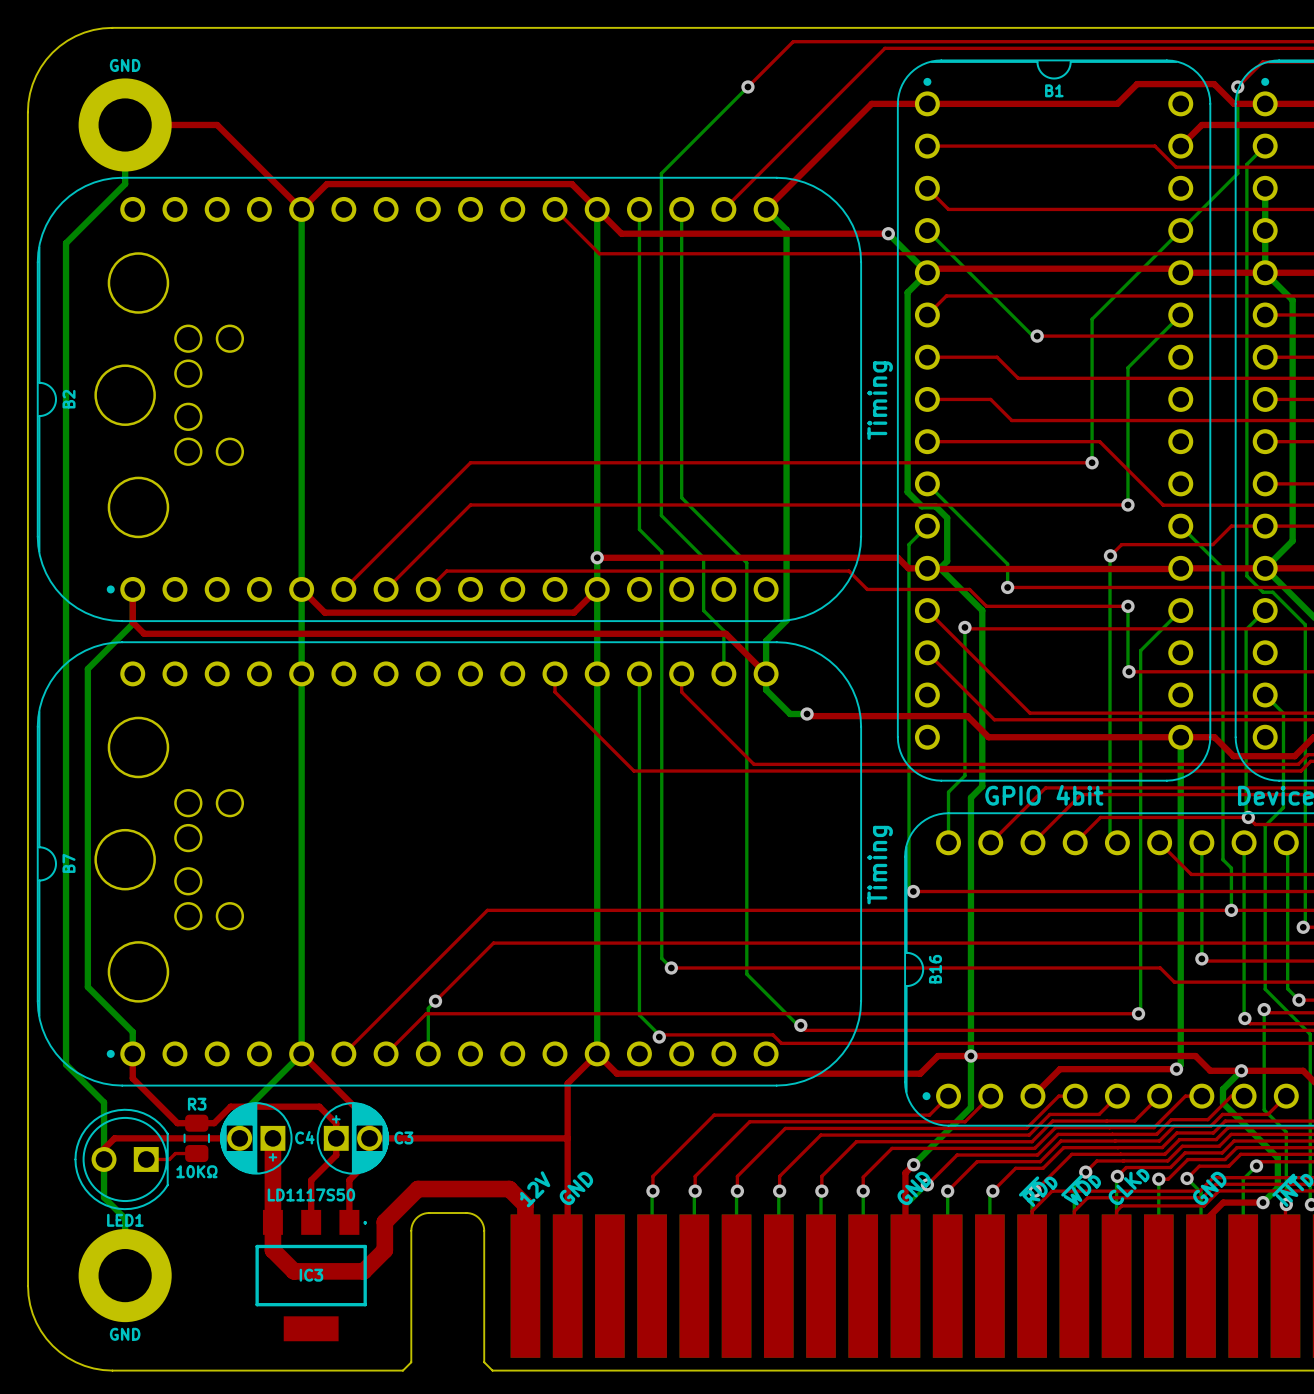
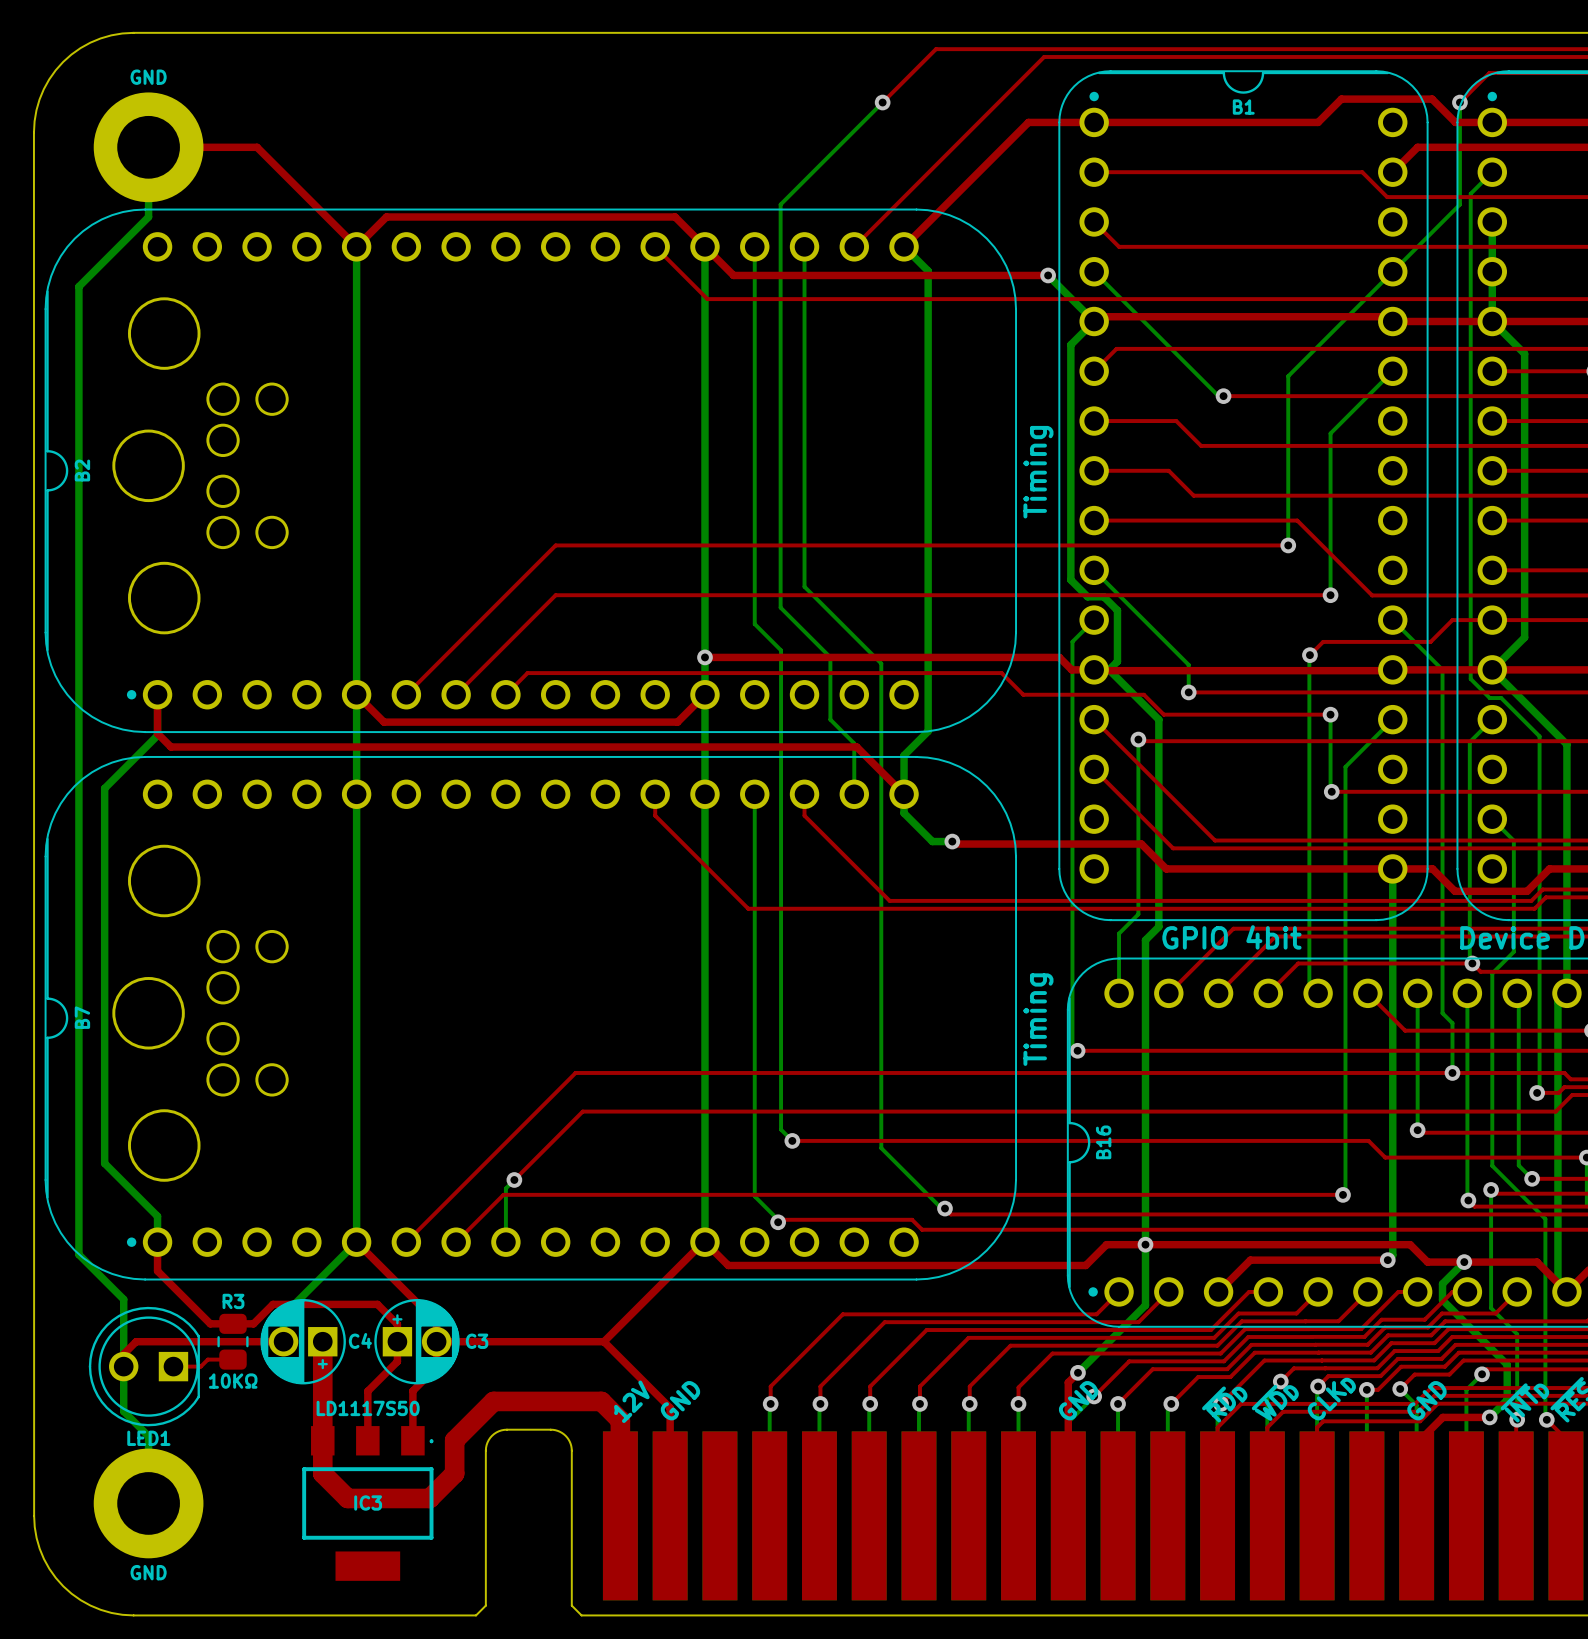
top track: (597, 1053) (567, 1083) (567, 1194) -> (704, 1242) (603, 1341) (670, 1407)
top track: (511, 1138) (567, 1138) -> none

